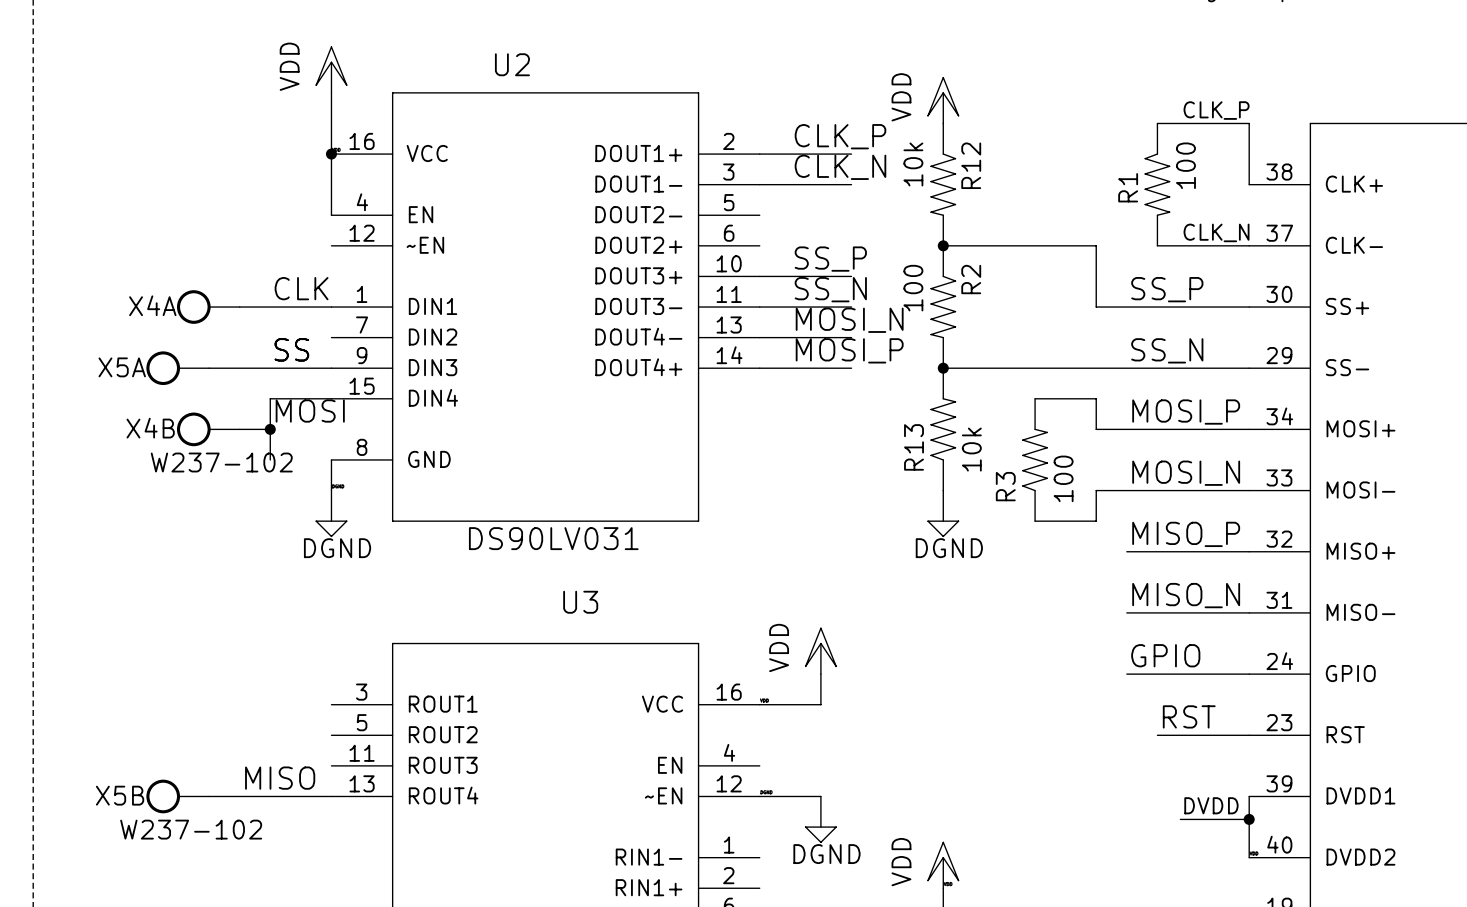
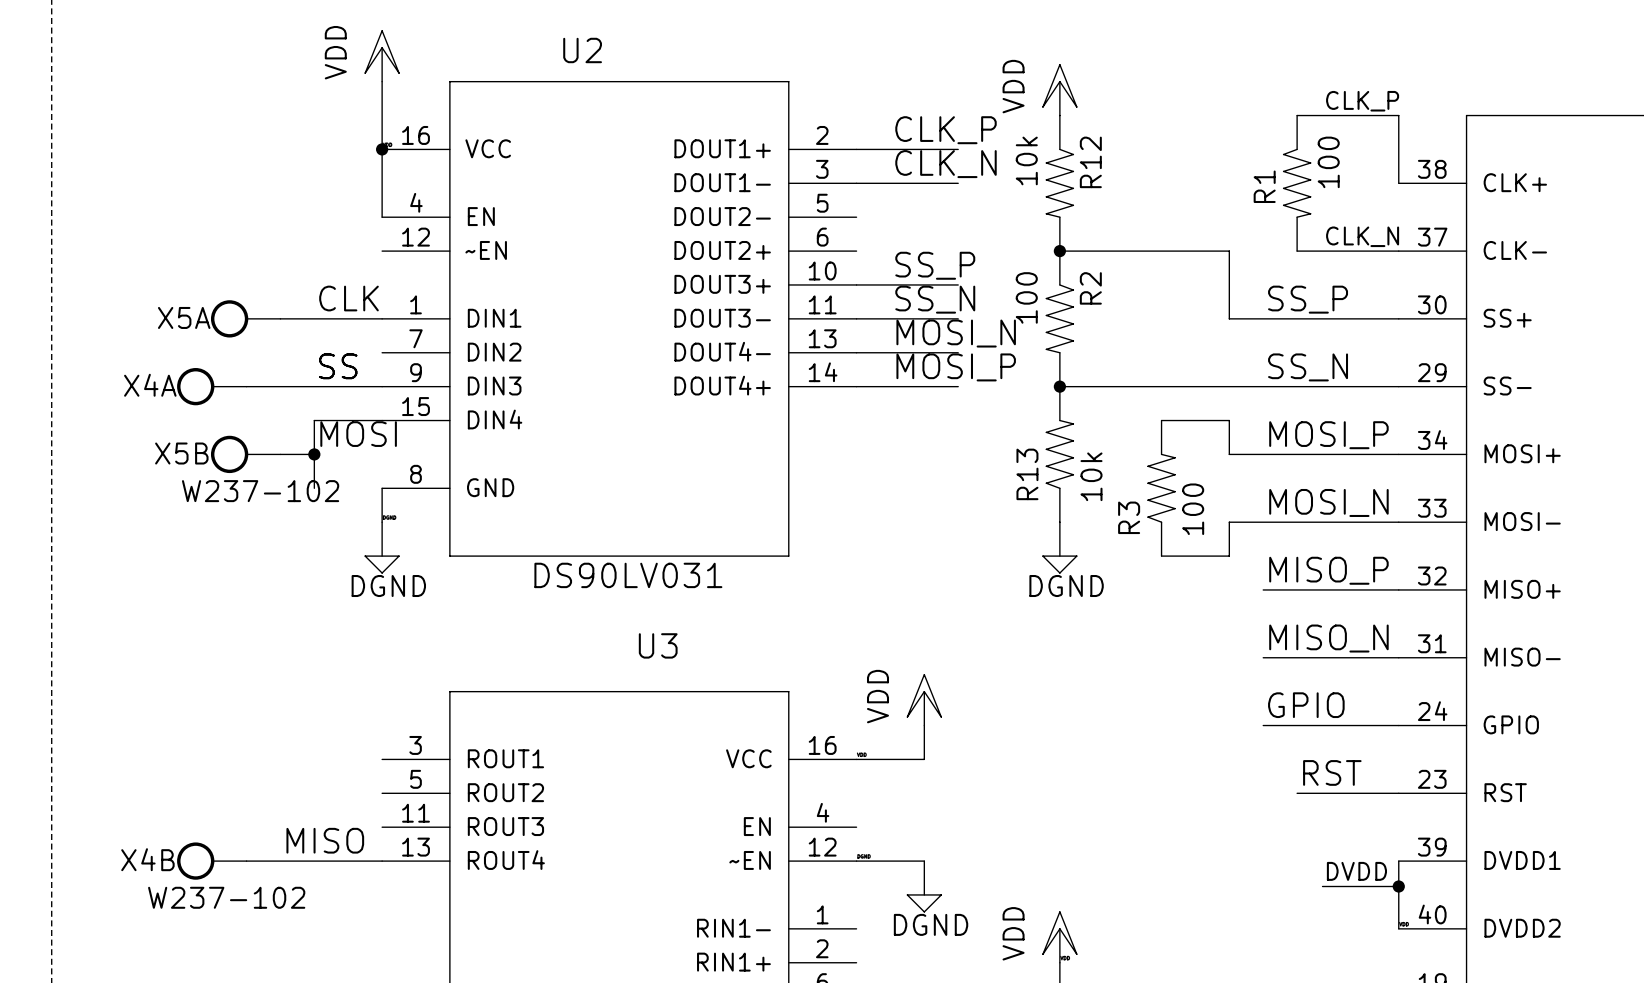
X4A name: X4A (152, 305) -> X5A (184, 317)
X5A name: X5A (122, 367) -> X4A (150, 385)
X4B name: X4B (150, 428) -> X5B (181, 453)
X5B name: X5B (120, 795) -> X4B (147, 859)

